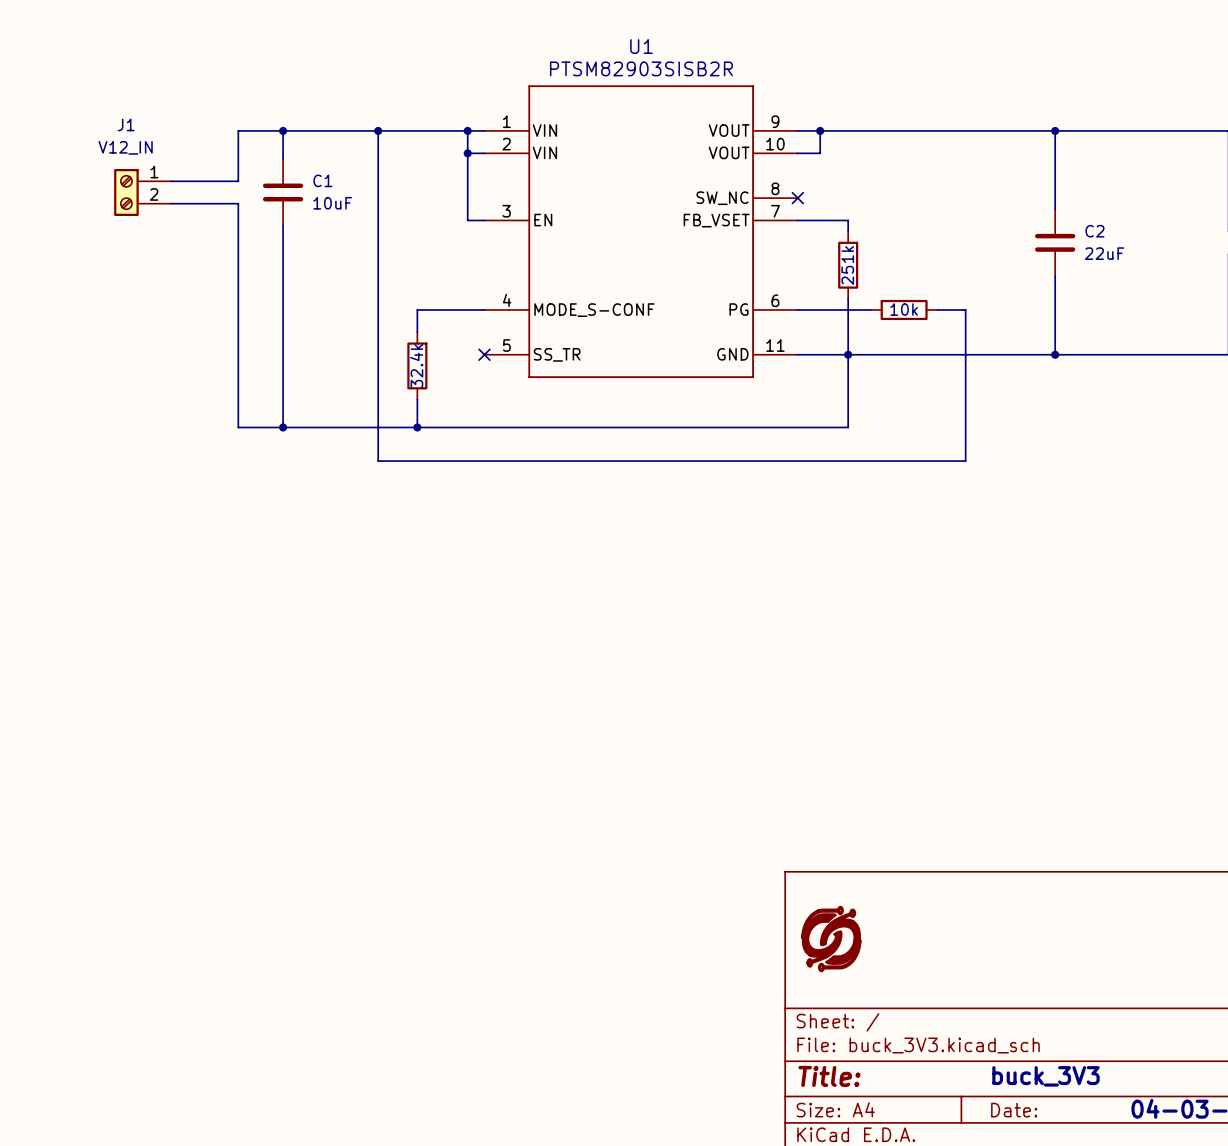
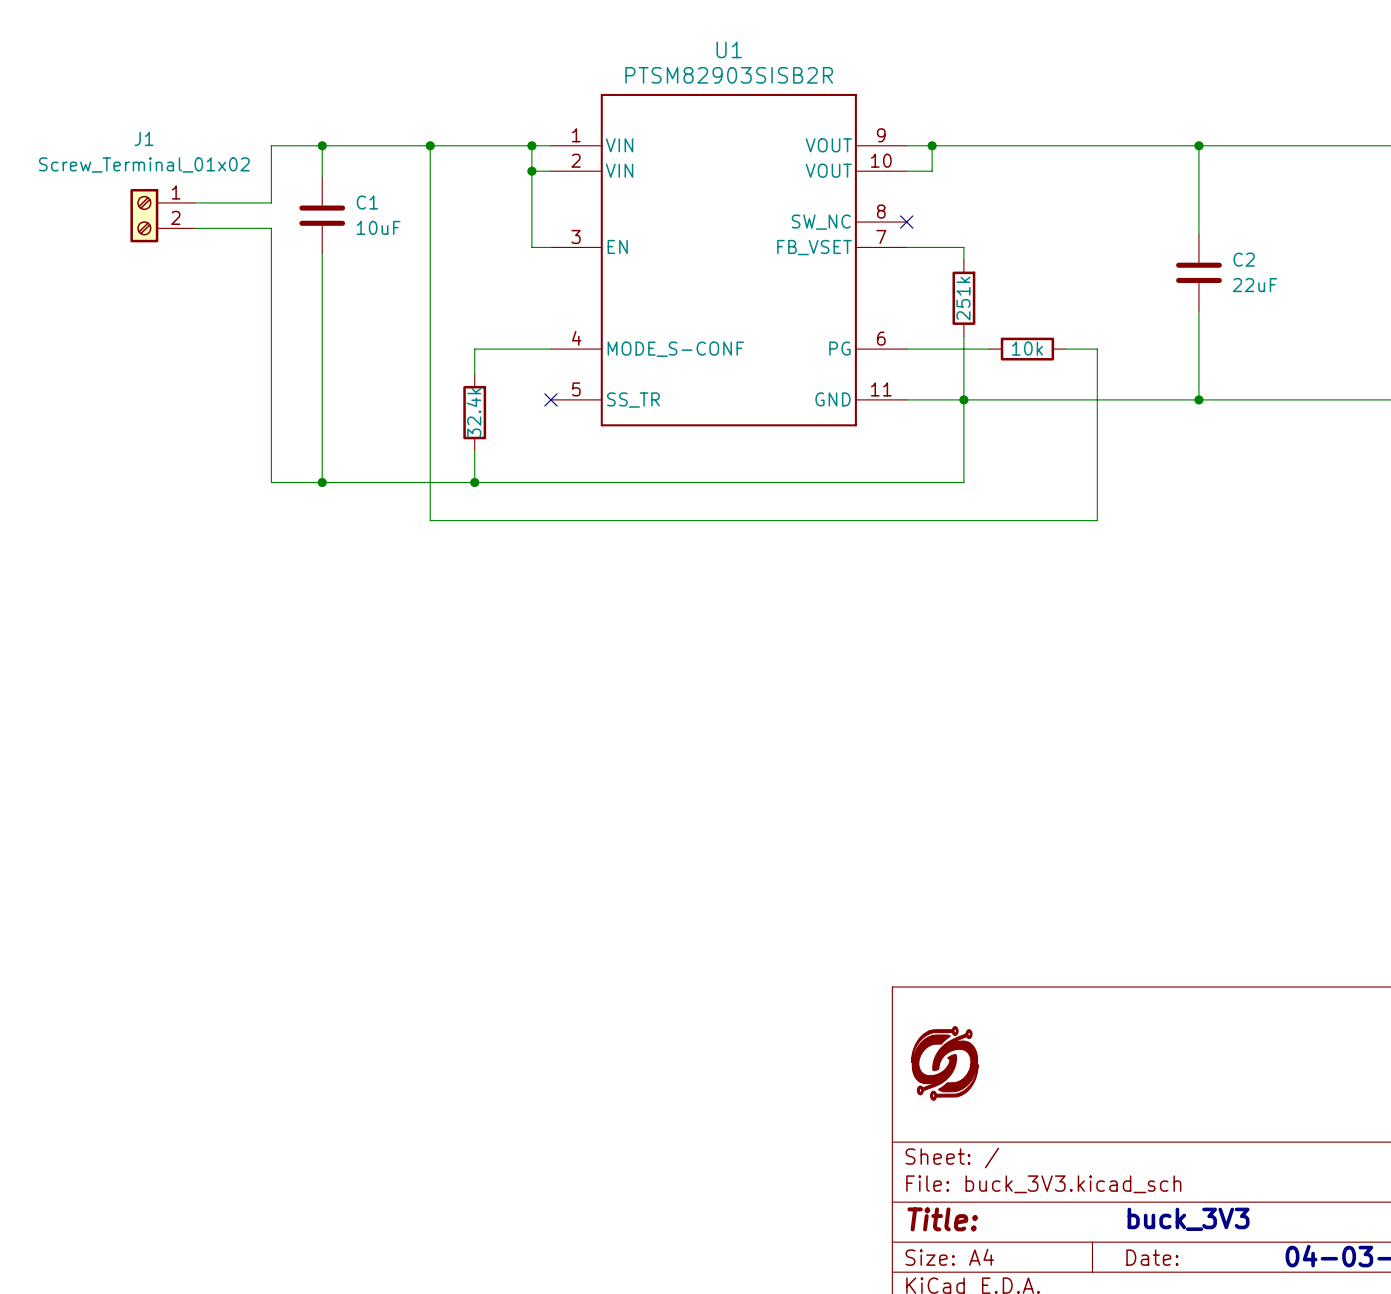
J1 value: V12_IN (125, 147) -> Screw_Terminal_01x02 (144, 164)

